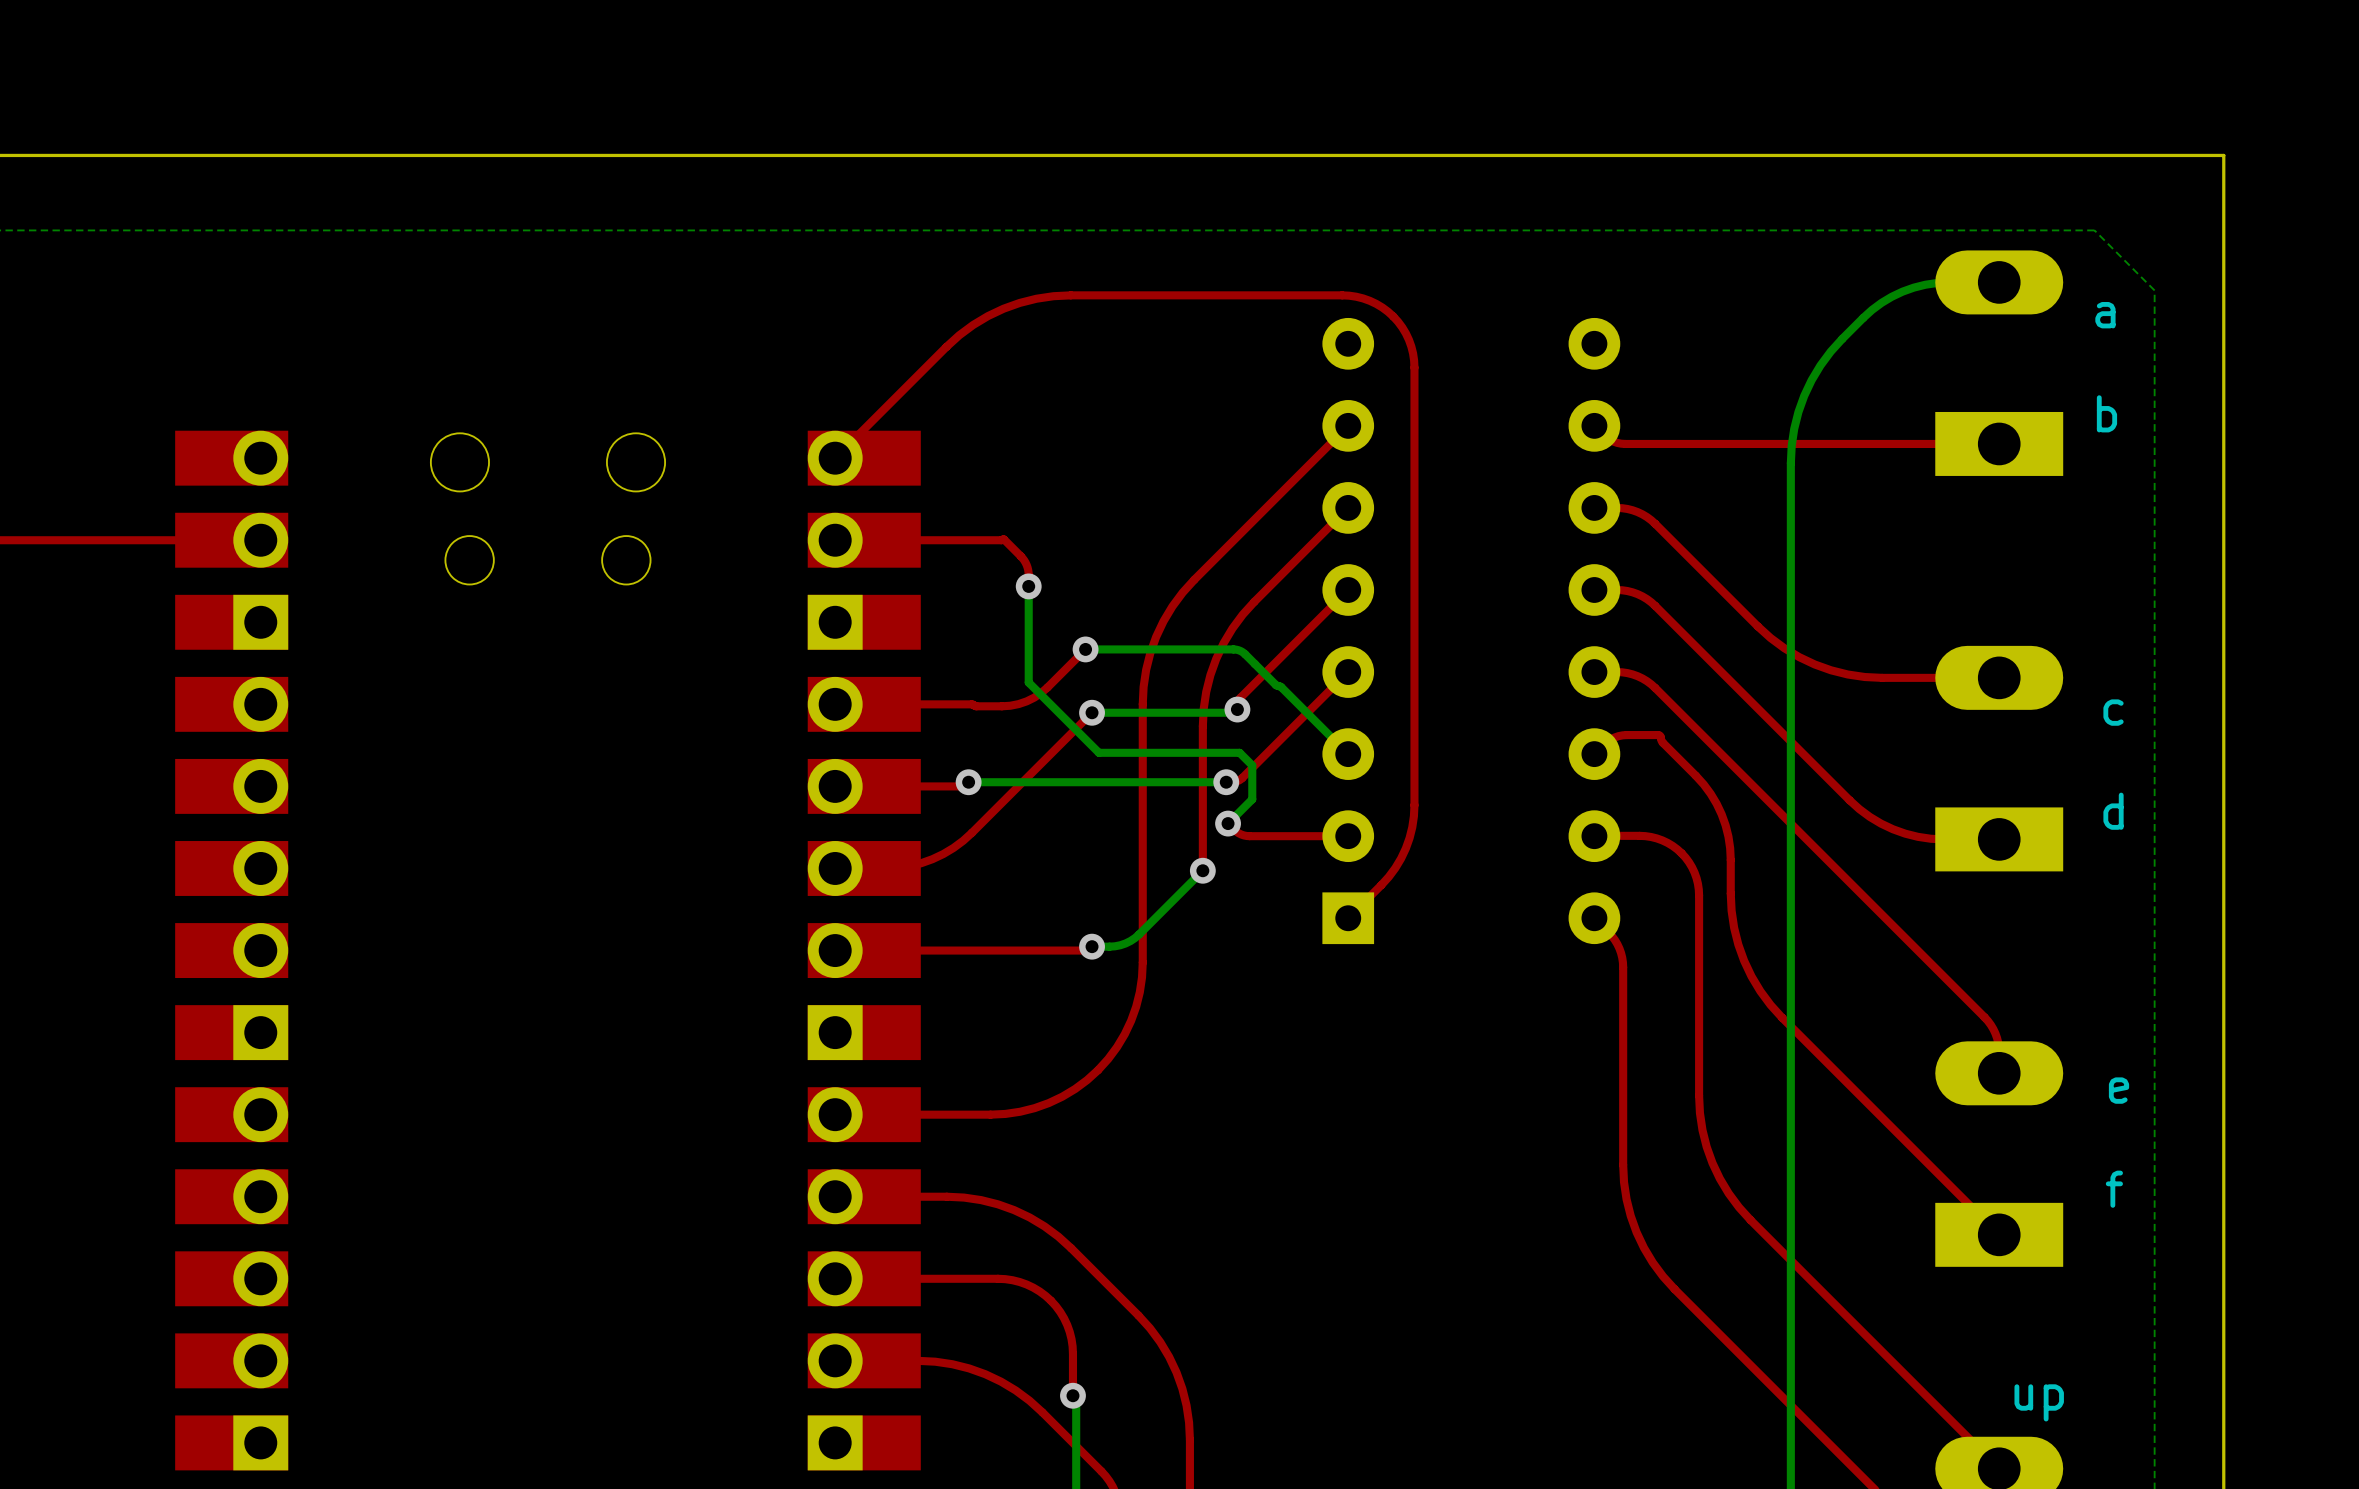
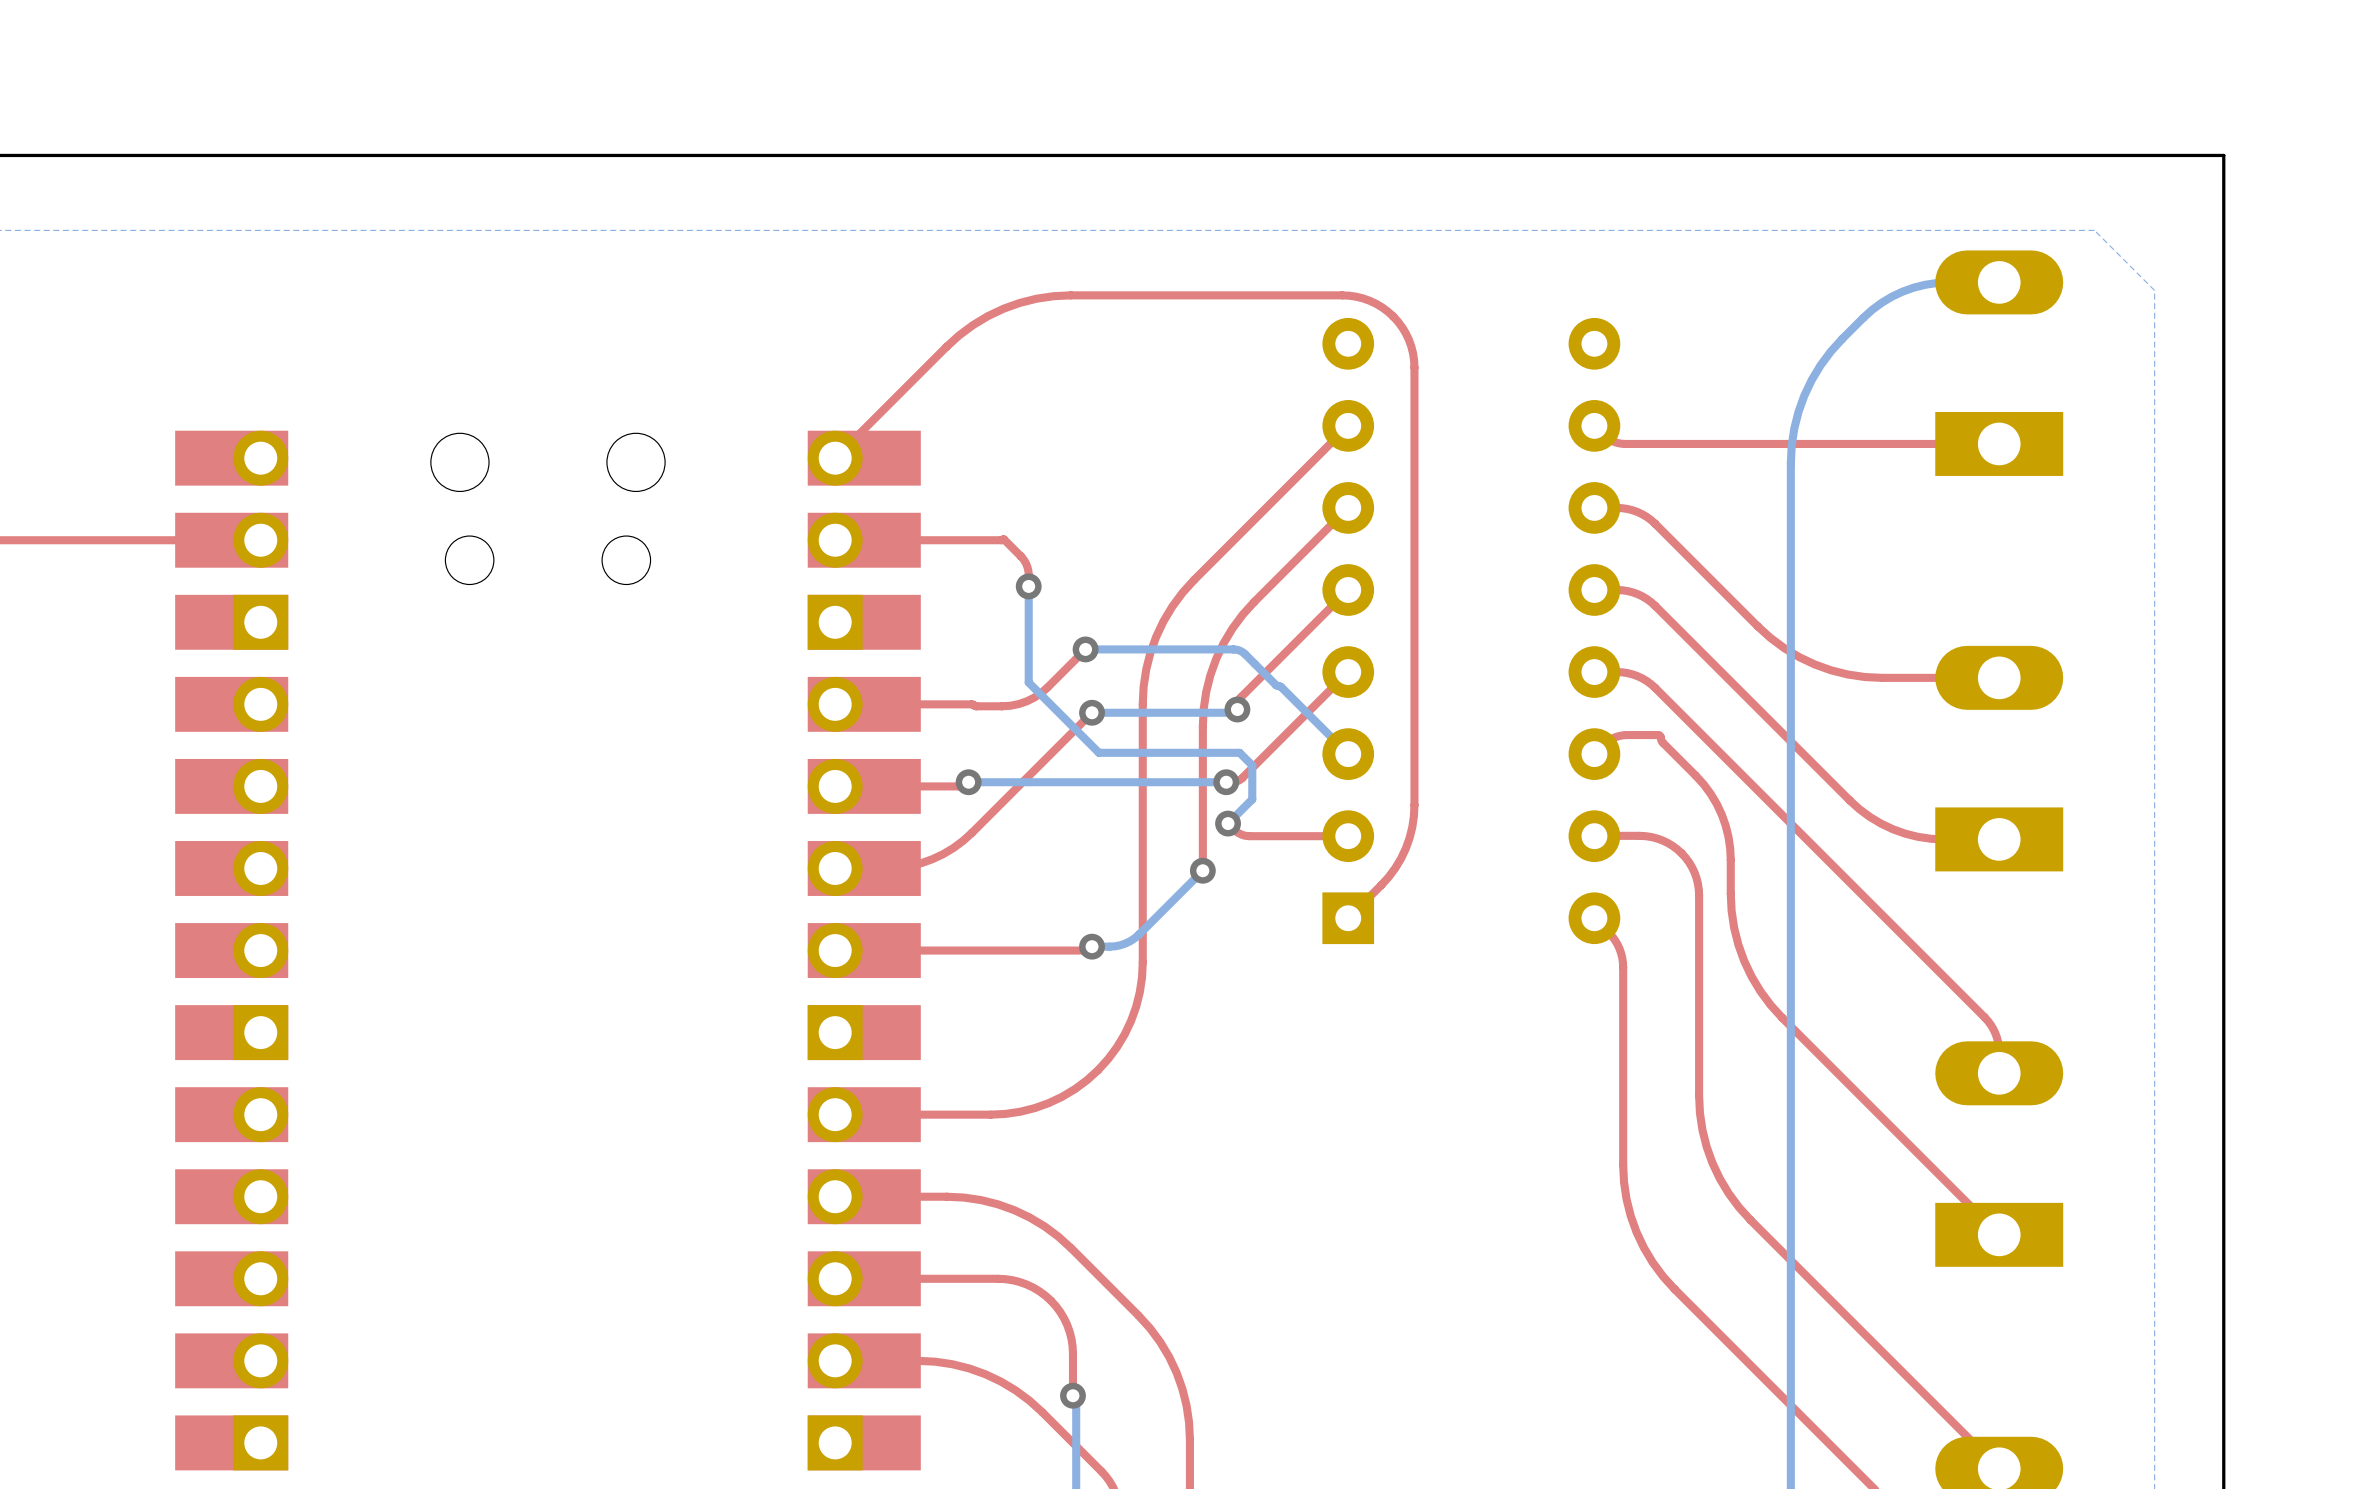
text: a (2105, 315) -> none
text: b (2106, 413) -> none
text: c (2113, 712) -> none
text: d (2113, 811) -> none
text: e (2119, 1090) -> none
text: f (2114, 1189) -> none
text: up (2039, 1402) -> none

